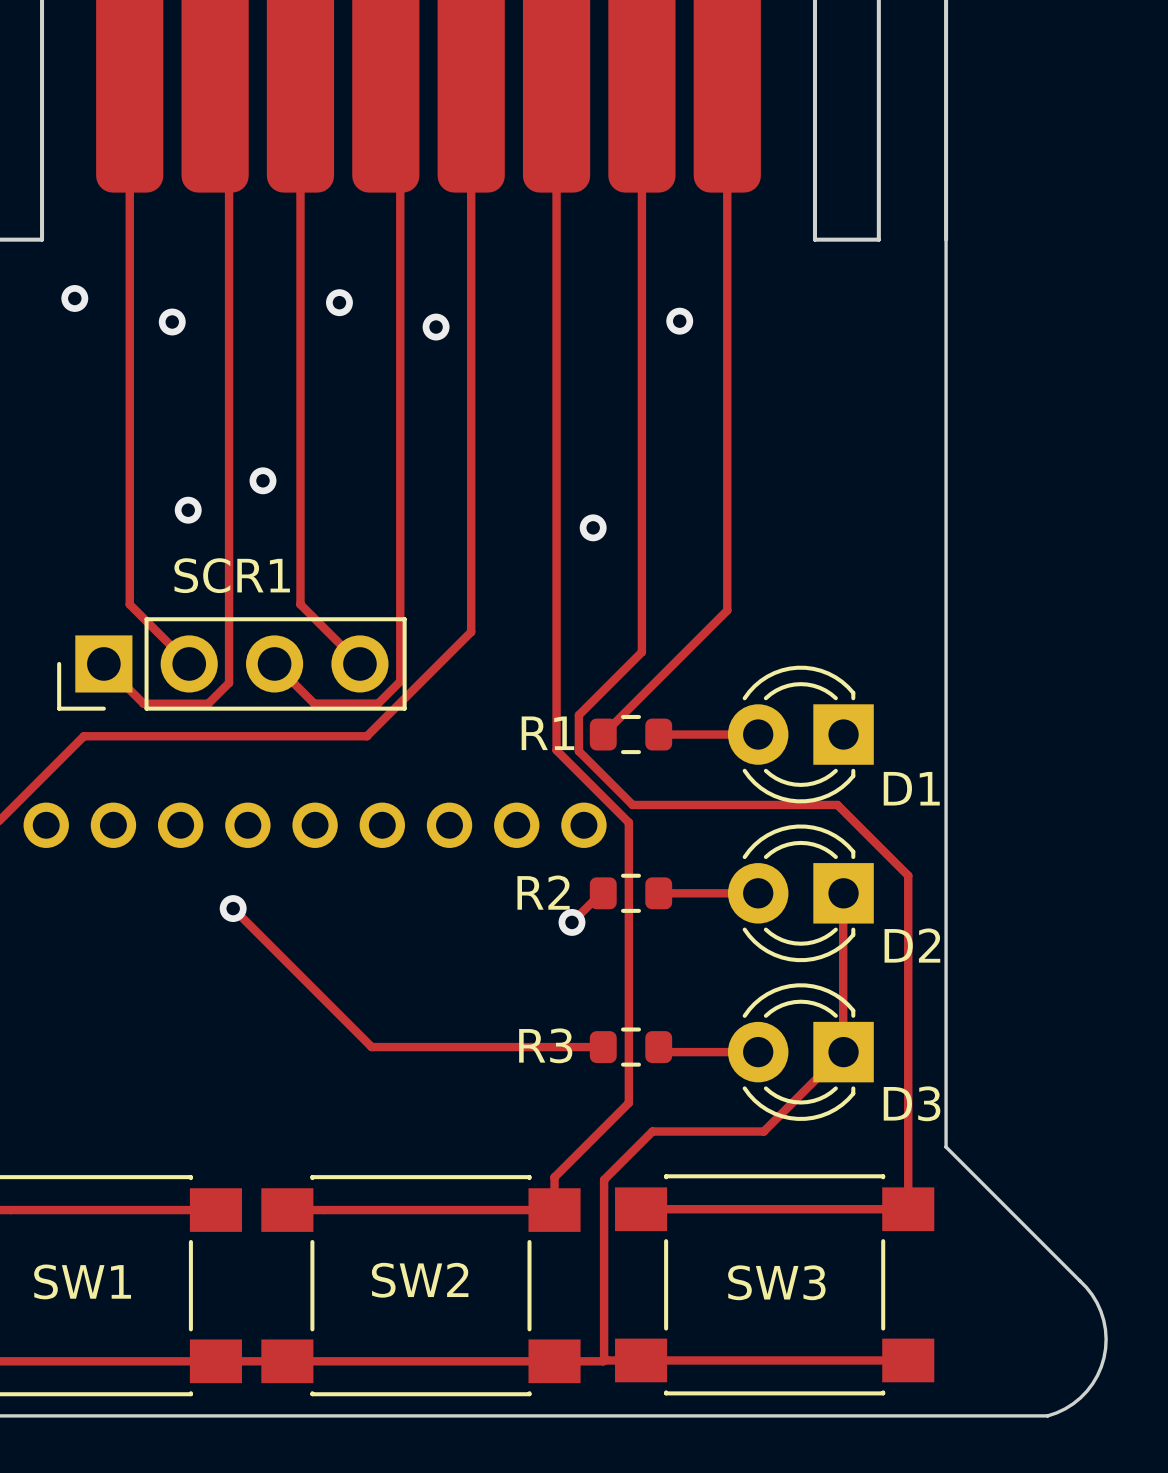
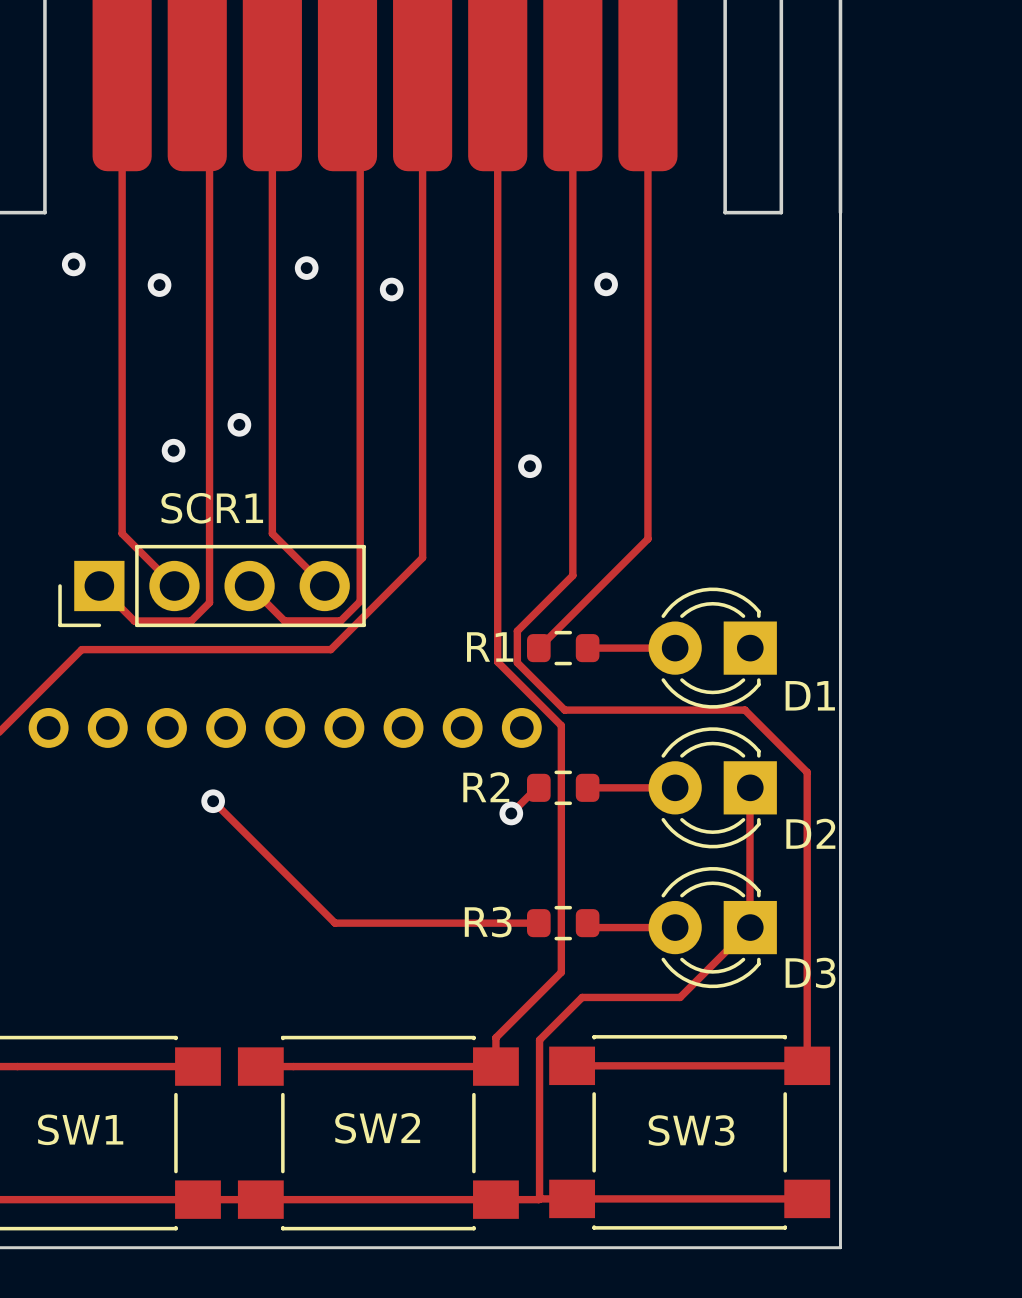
board edge: (946, 1147) (1086, 1287) (1100, 1311) (1106, 1339) (1104, 1357) (1097, 1375) (1080, 1397) (1065, 1408) (1047, 1415) (946, 1415) -> (840, 1011) (840, 1247)

